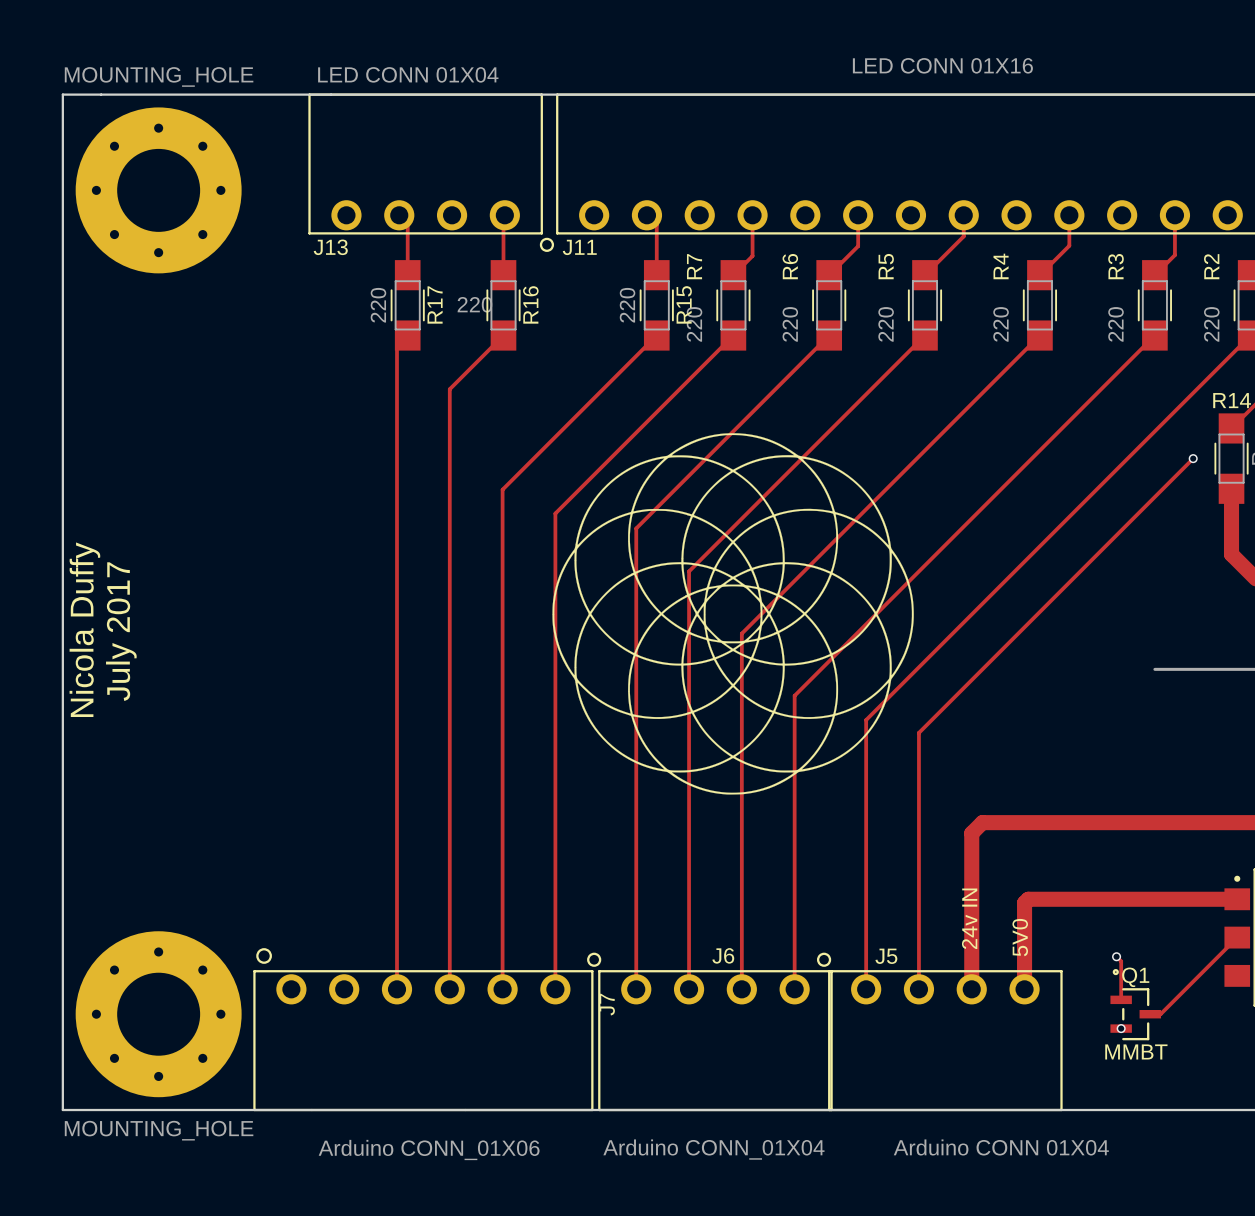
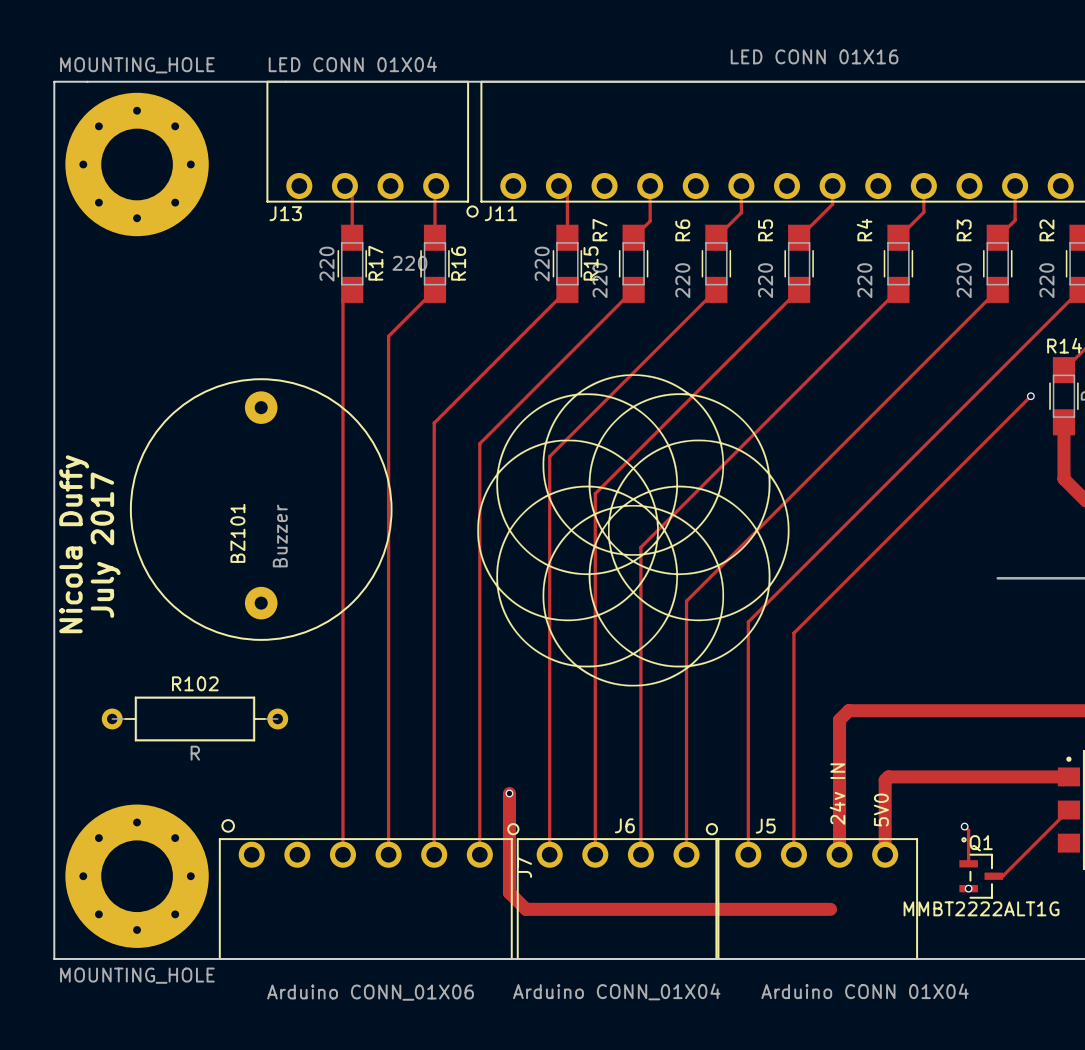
BZ101: none -> Buzzer (261, 509)
R102: none -> R (194, 718)
track: none -> (509, 793) (509, 892) (526, 909) (830, 909)
via: none -> (509, 793)
Q1 value: MMBT (1136, 1051) -> MMBT2222ALT1G (981, 908)

